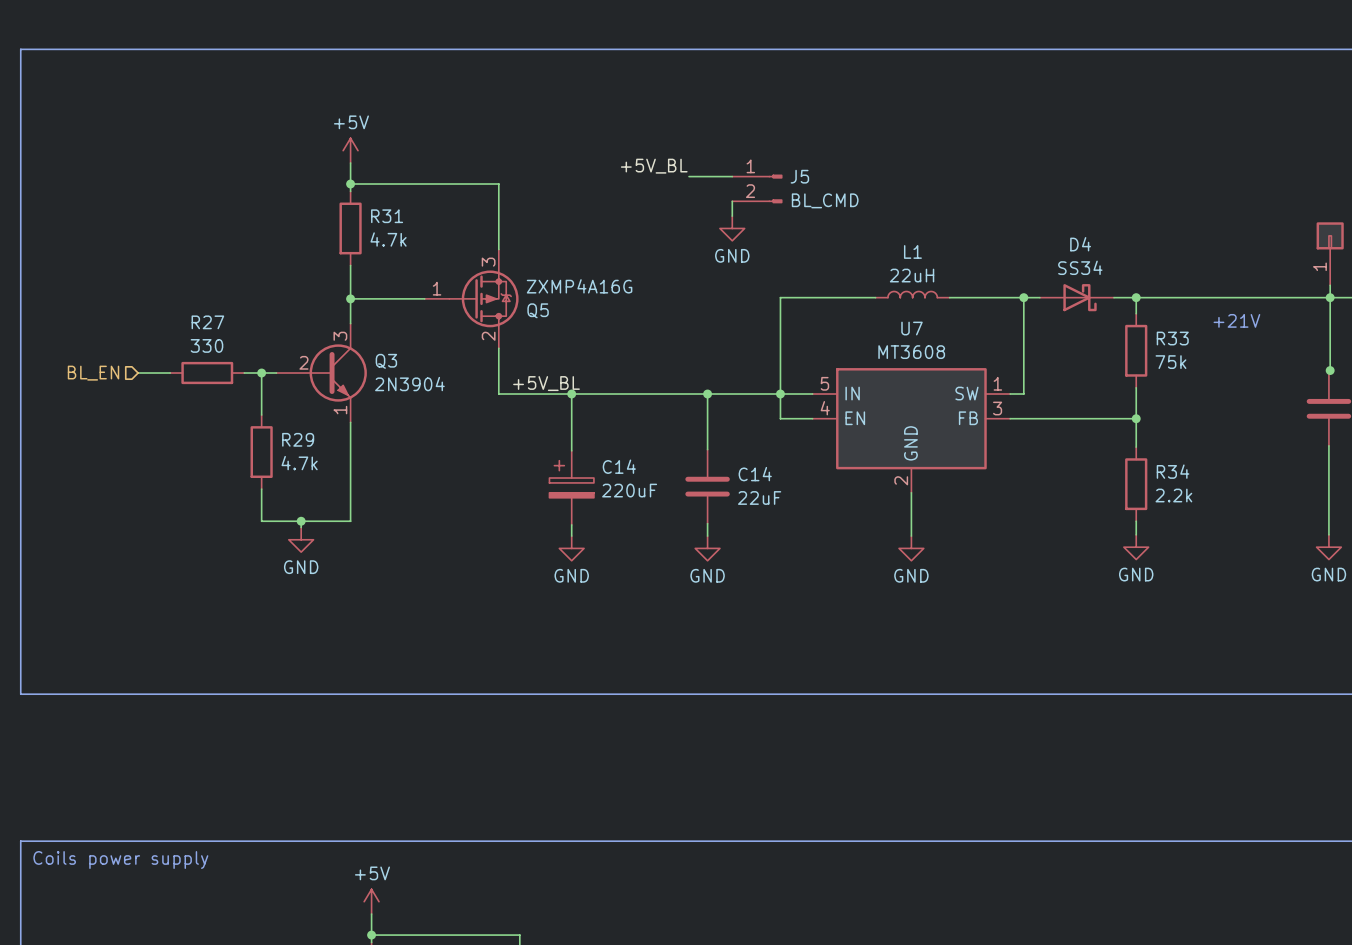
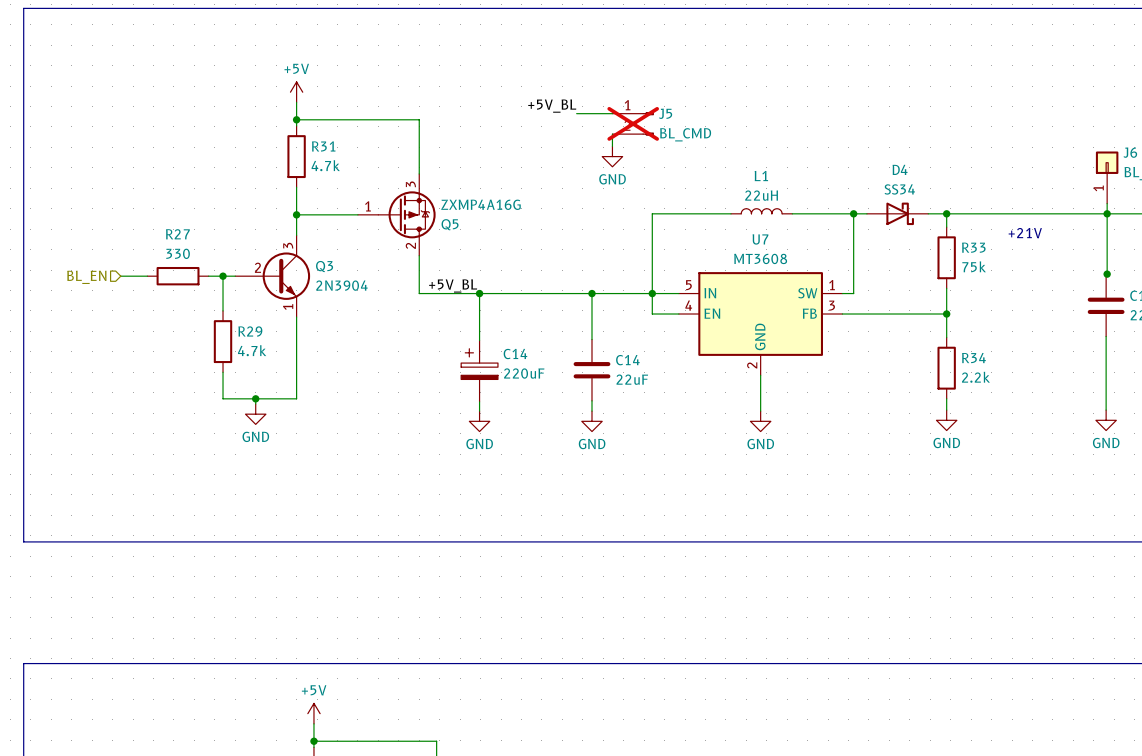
J5 do-not-place cross: none -> (633, 123)
text: Coils power supply (120, 860) -> none

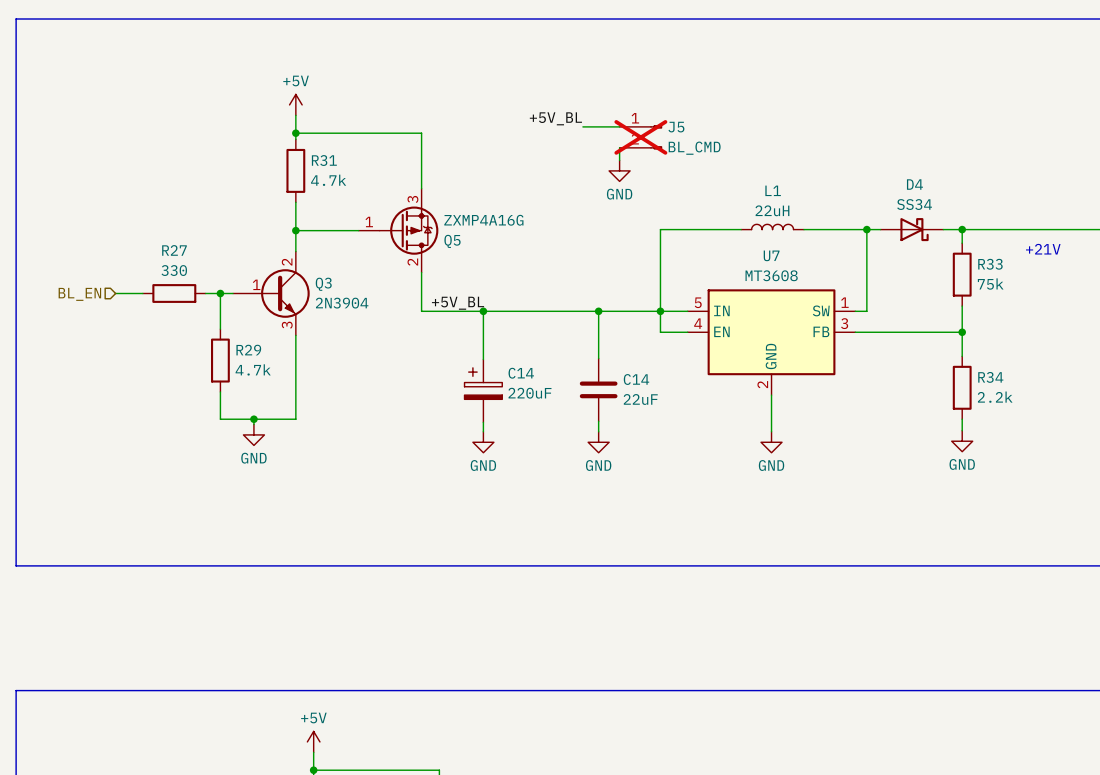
Q3 pin number: 3 (288, 245) -> 2 (287, 262)
Q3 pin number: 2 (257, 267) -> 1 (256, 284)
Q3 pin number: 1 (288, 307) -> 3 (287, 325)

